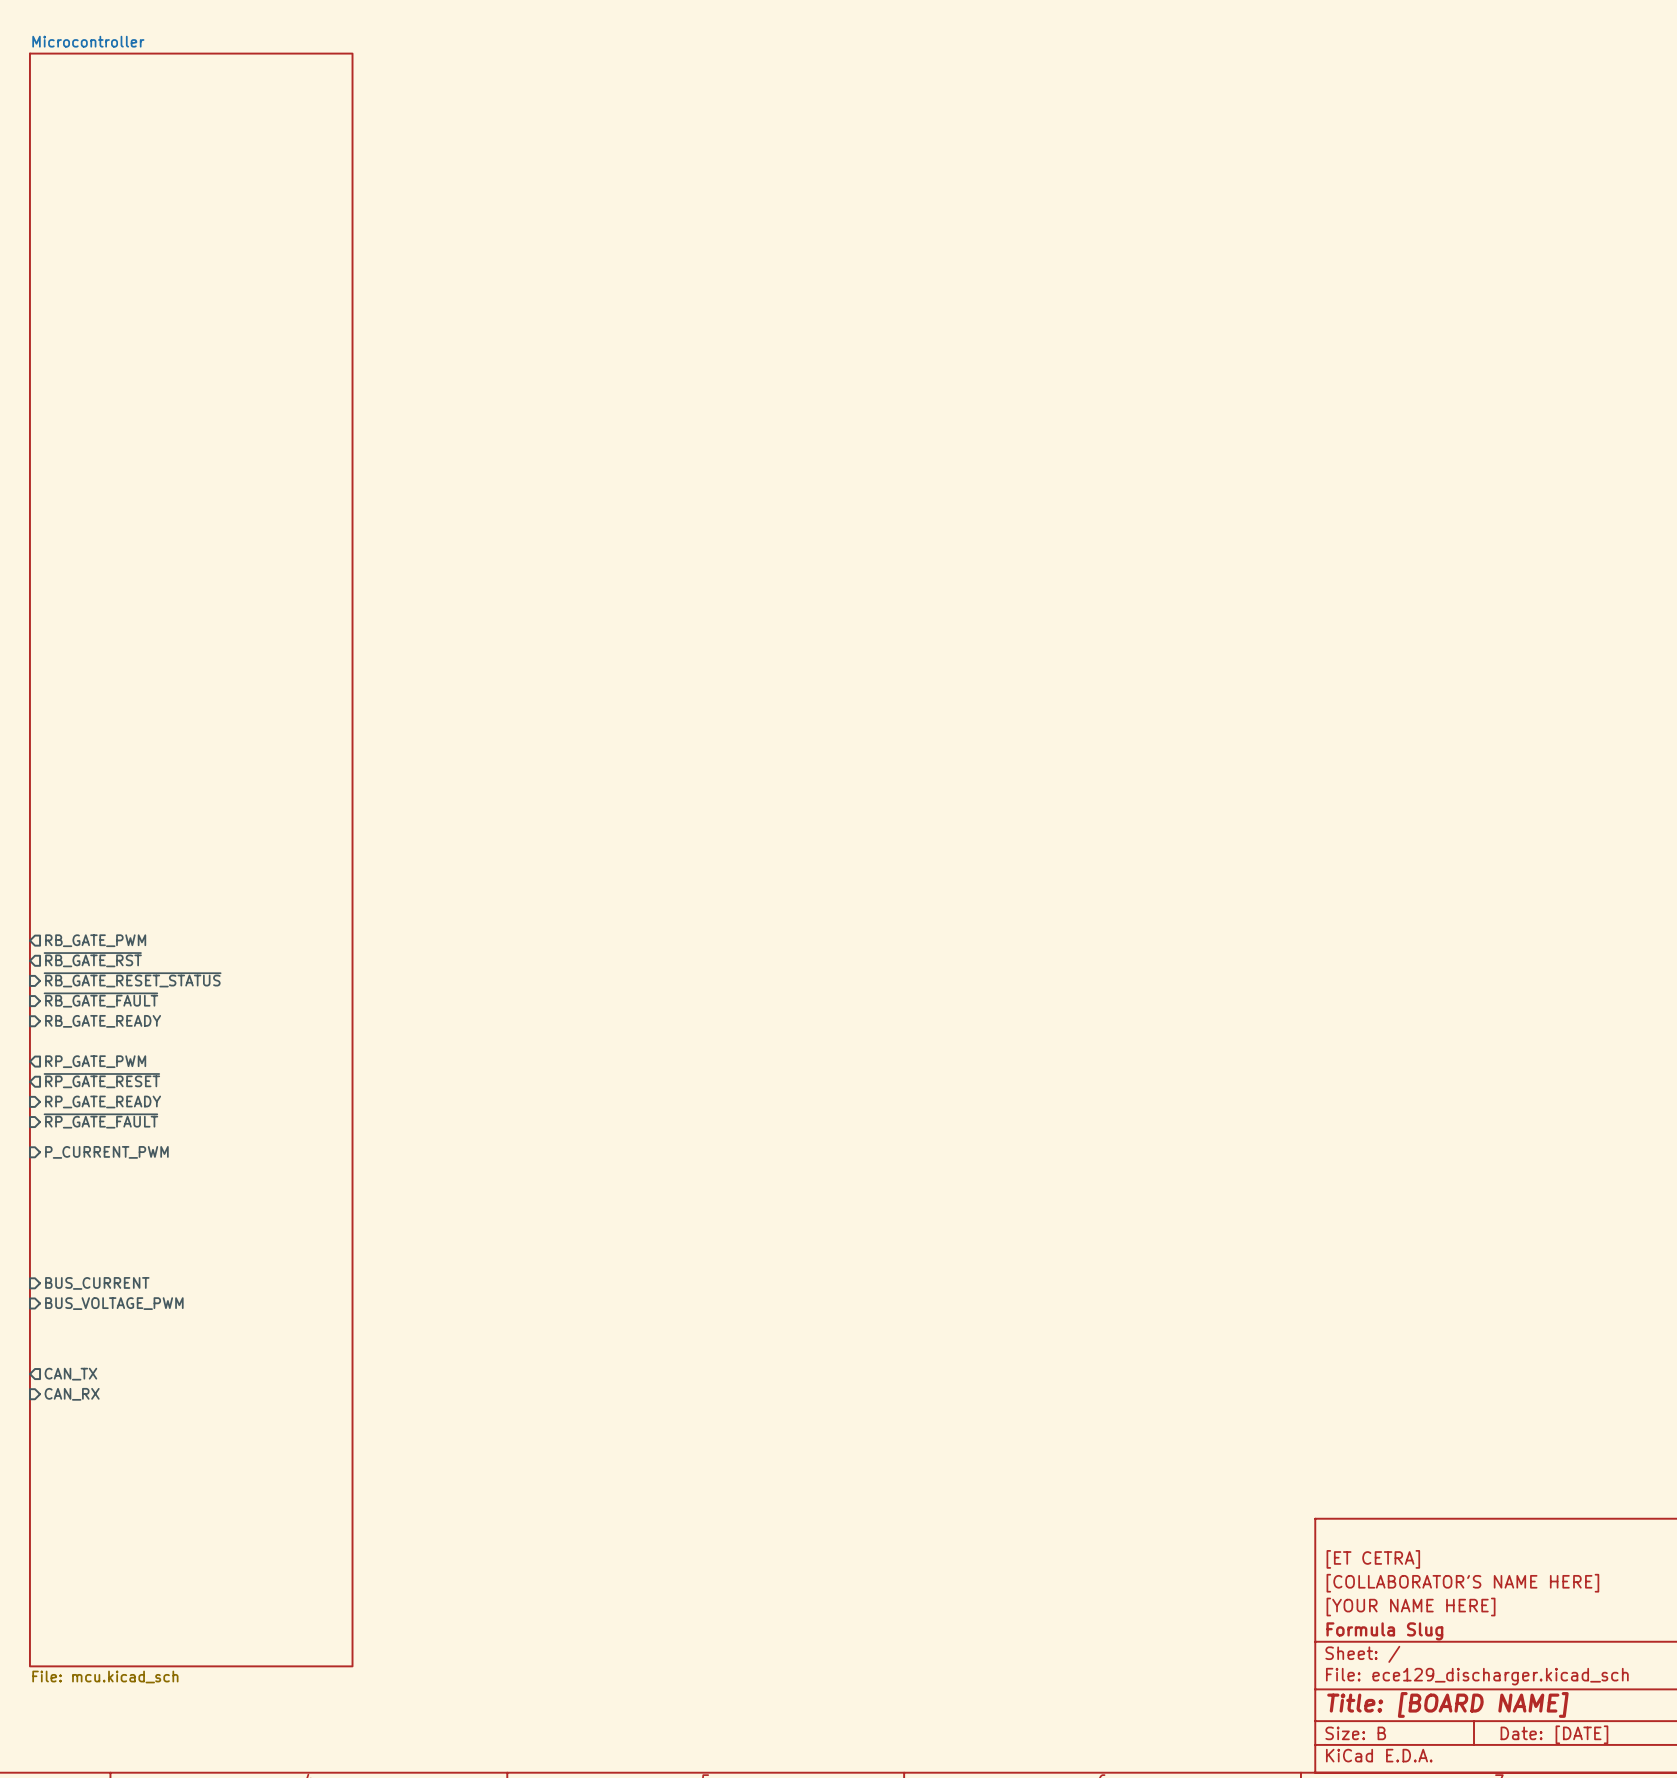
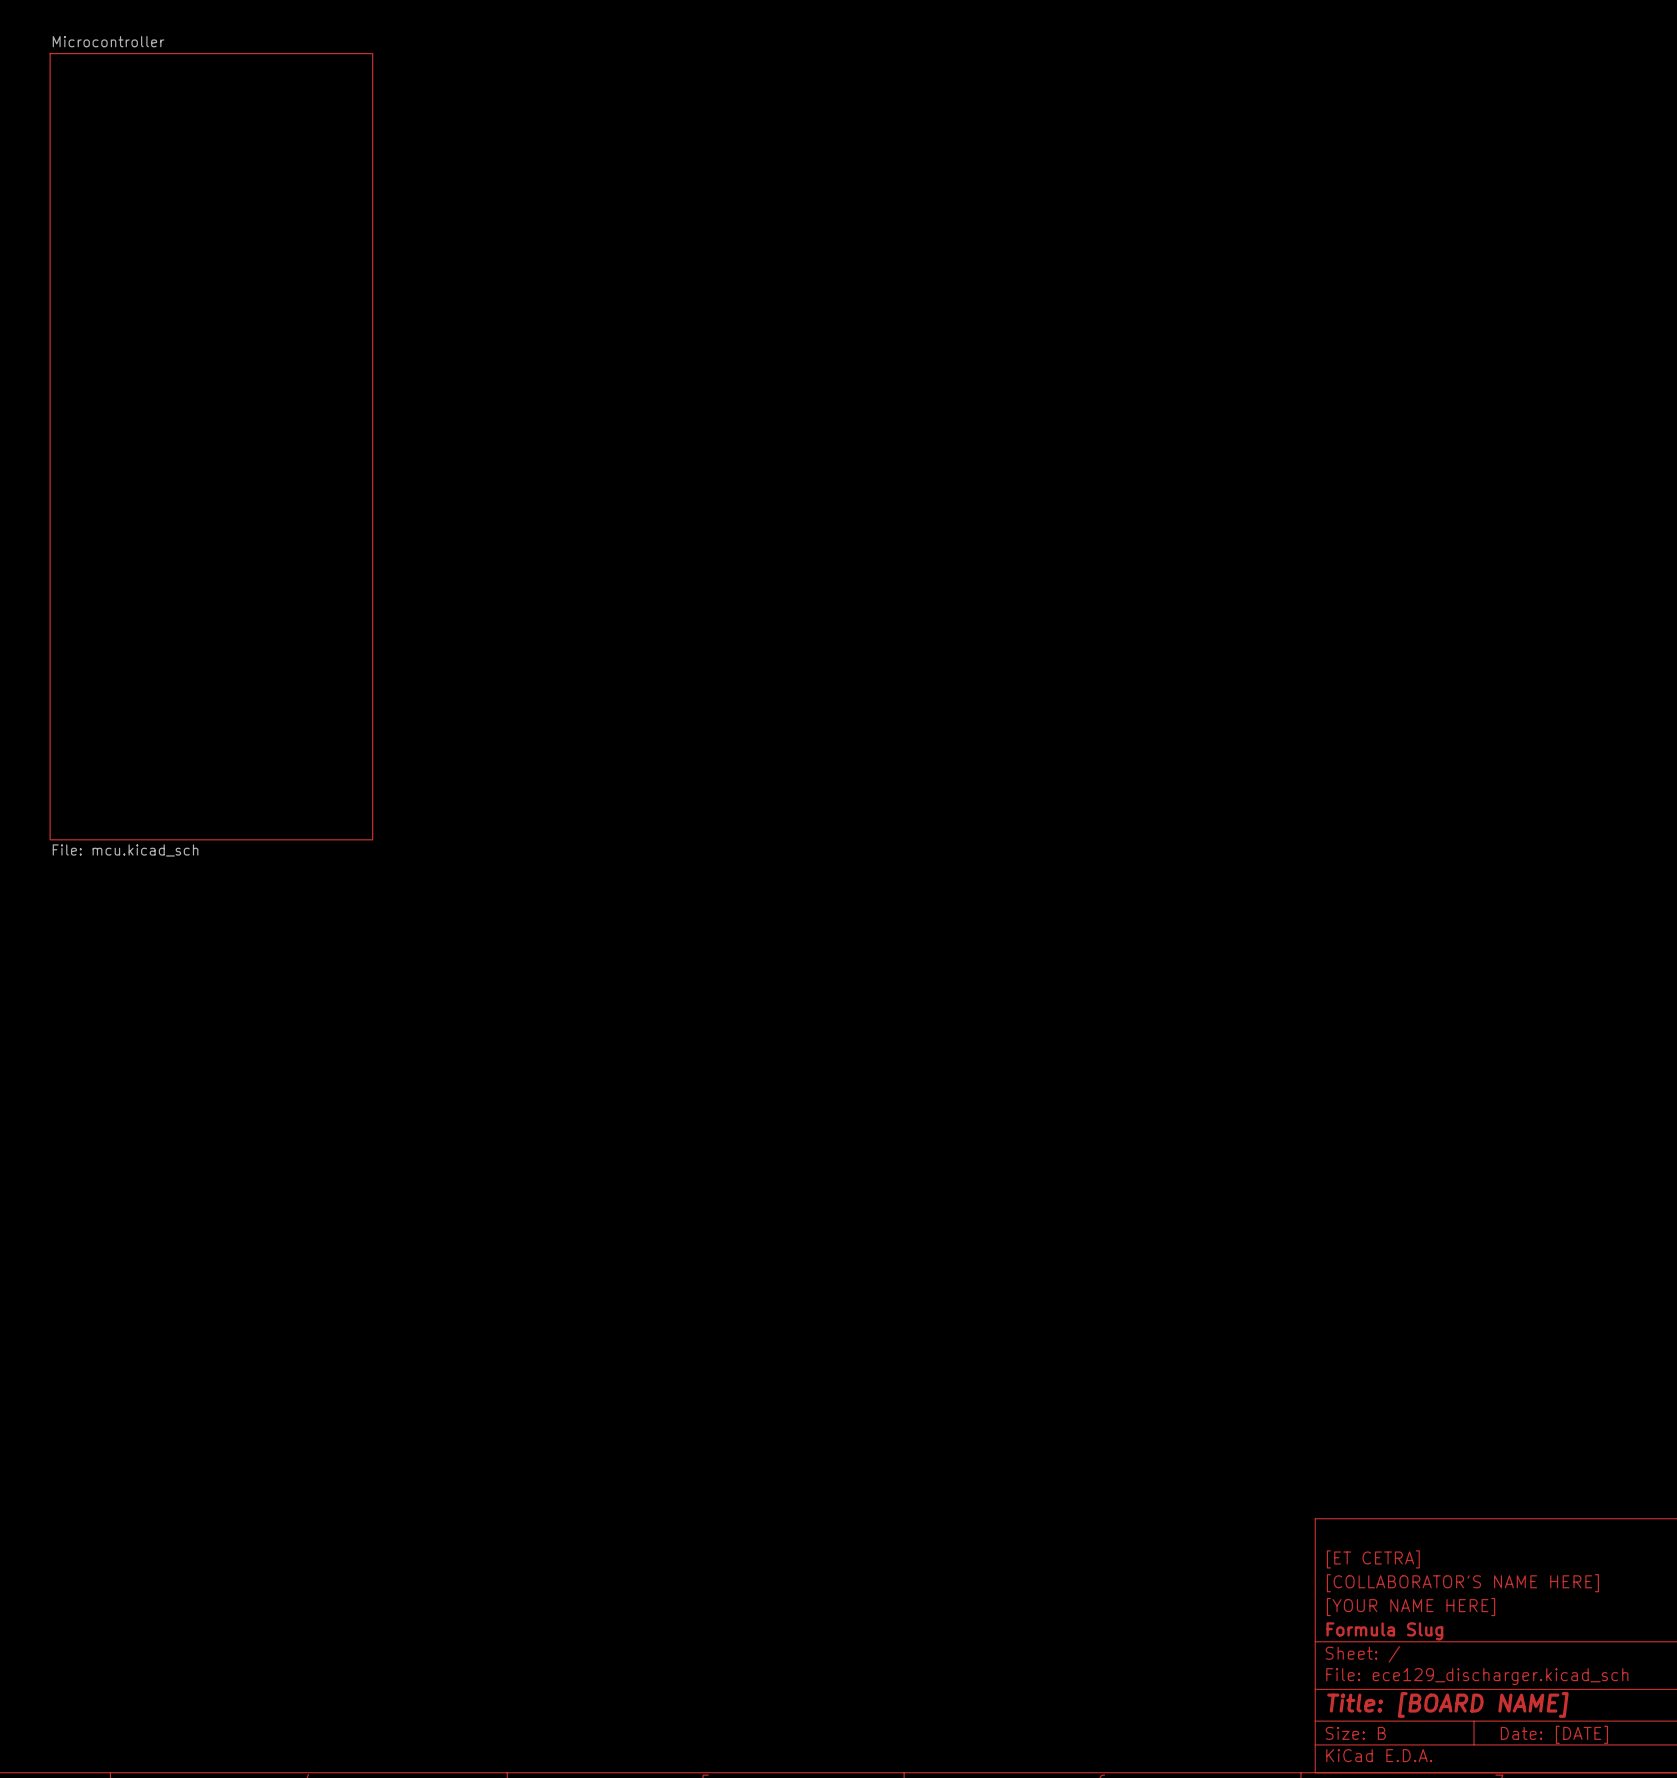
sheet Microcontroller: none -> File: mcu.kicad_sch (211, 446)
sheet Microcontroller: File: mcu.kicad_sch (191, 859) -> none
sheet pin: RB_GATE_PWM (95, 940) -> none
sheet pin: ~{RB_GATE_RST} (92, 959) -> none
sheet pin: ~{RB_GATE_RESET_STATUS} (132, 979) -> none
sheet pin: ~{RB_GATE_FAULT} (100, 1000) -> none
sheet pin: RB_GATE_READY (103, 1021) -> none
sheet pin: RP_GATE_PWM (95, 1061) -> none
sheet pin: ~{RP_GATE_RESET} (101, 1080) -> none
sheet pin: RP_GATE_READY (103, 1101) -> none
sheet pin: ~{RP_GATE_FAULT} (100, 1120) -> none
sheet pin: P_CURRENT_PWM (106, 1152) -> none
sheet pin: BUS_CURRENT (97, 1283) -> none
sheet pin: BUS_VOLTAGE_PWM (114, 1303) -> none
sheet pin: CAN_TX (70, 1374) -> none
sheet pin: CAN_RX (72, 1394) -> none

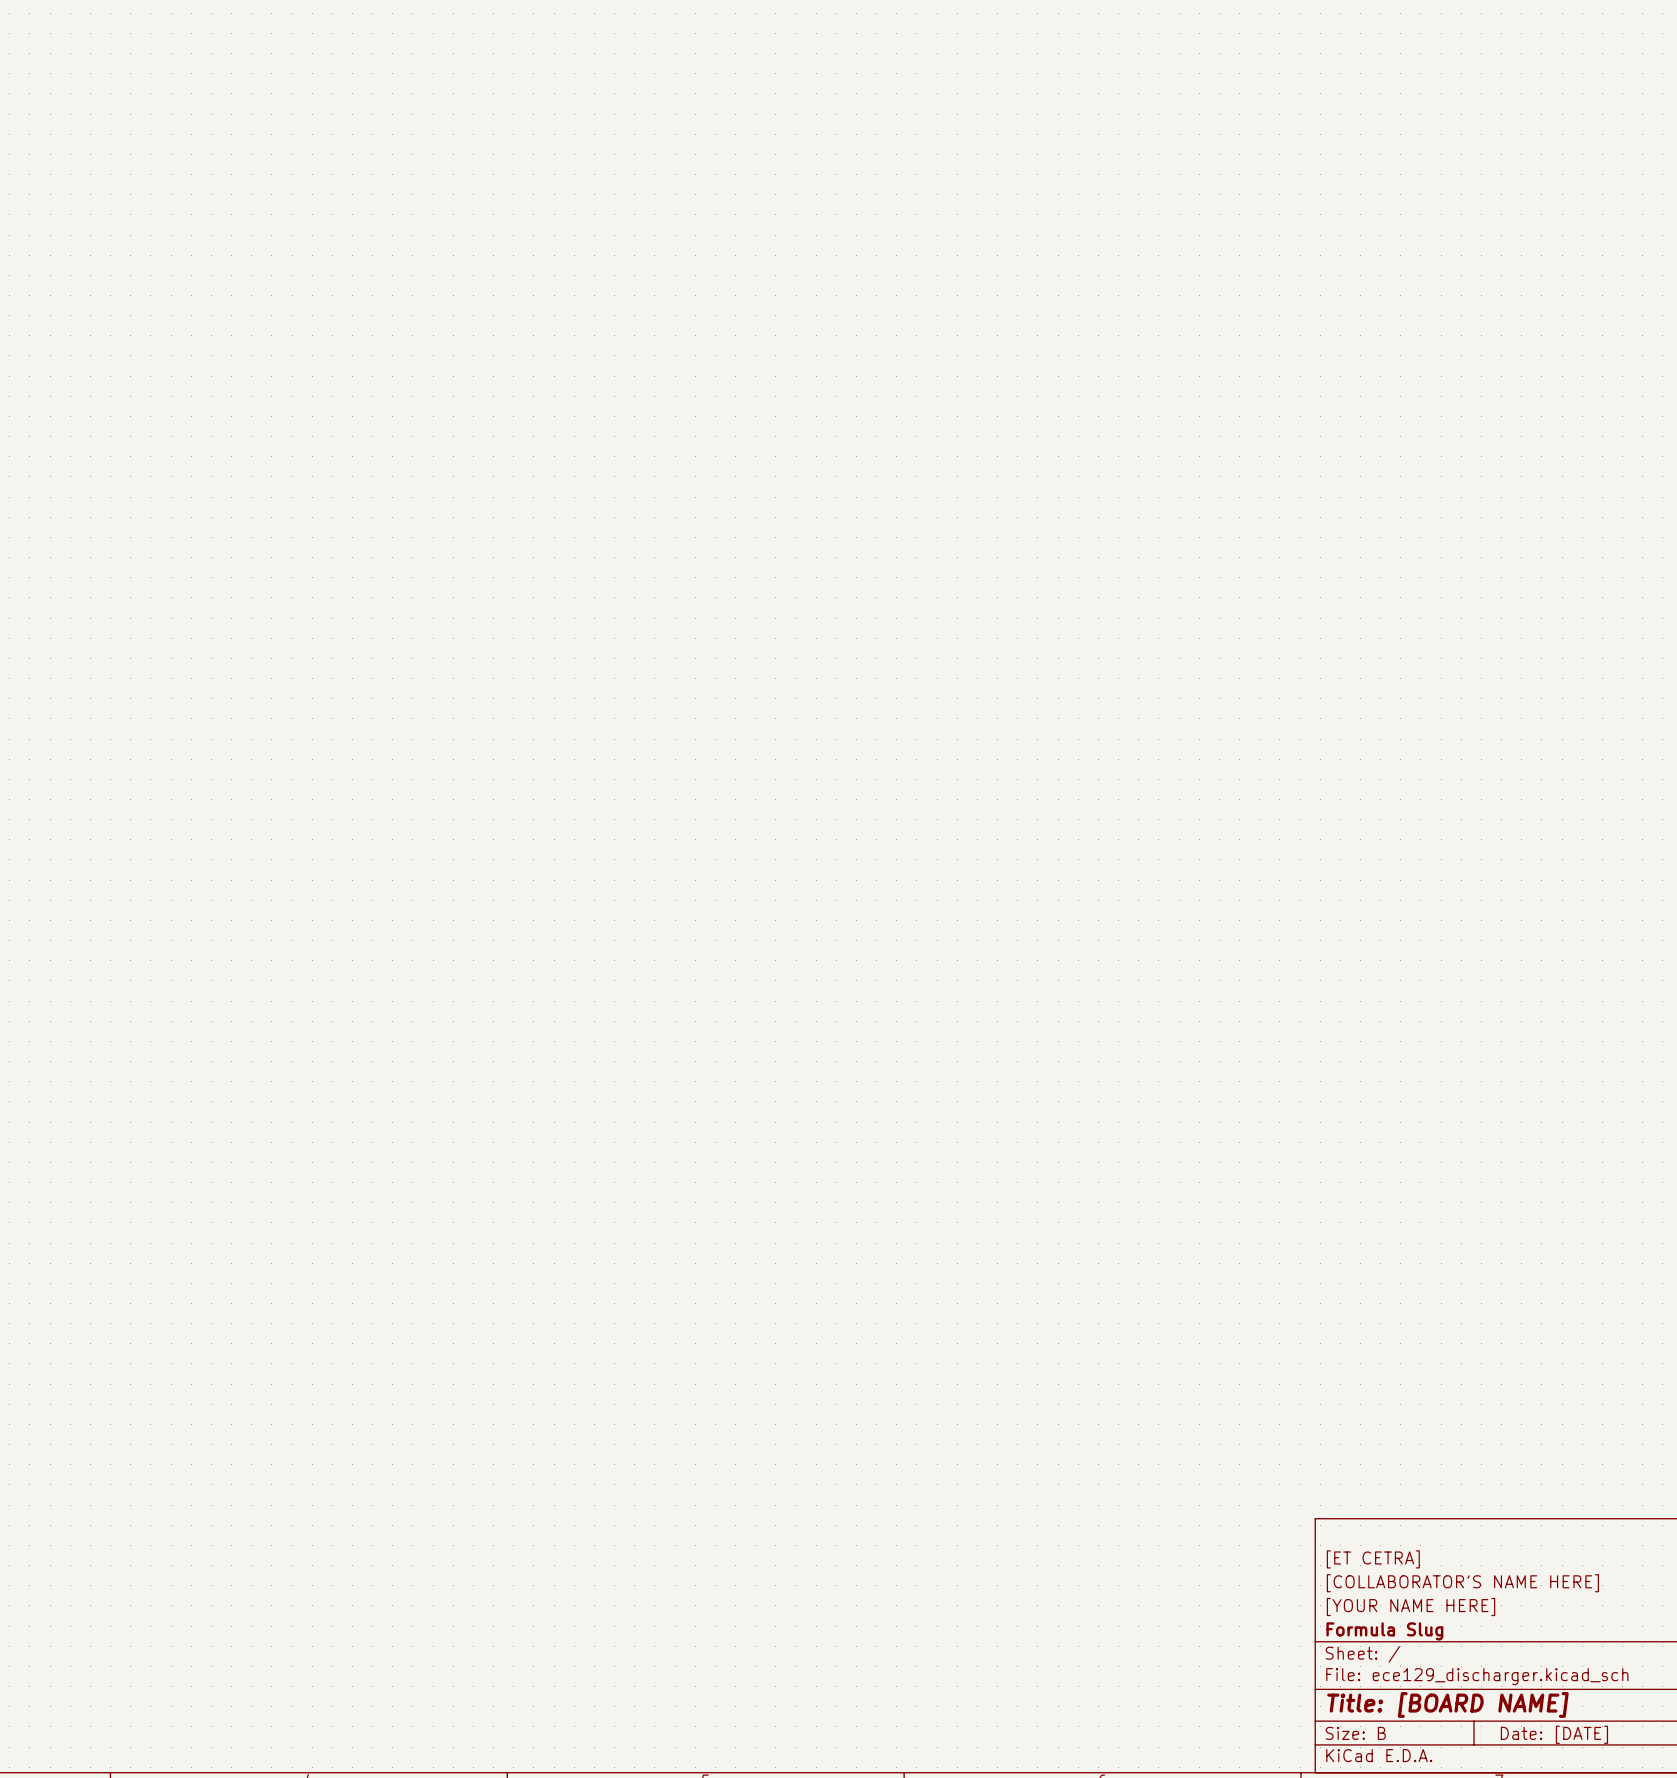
sheet Microcontroller: File: mcu.kicad_sch (211, 446) -> none

